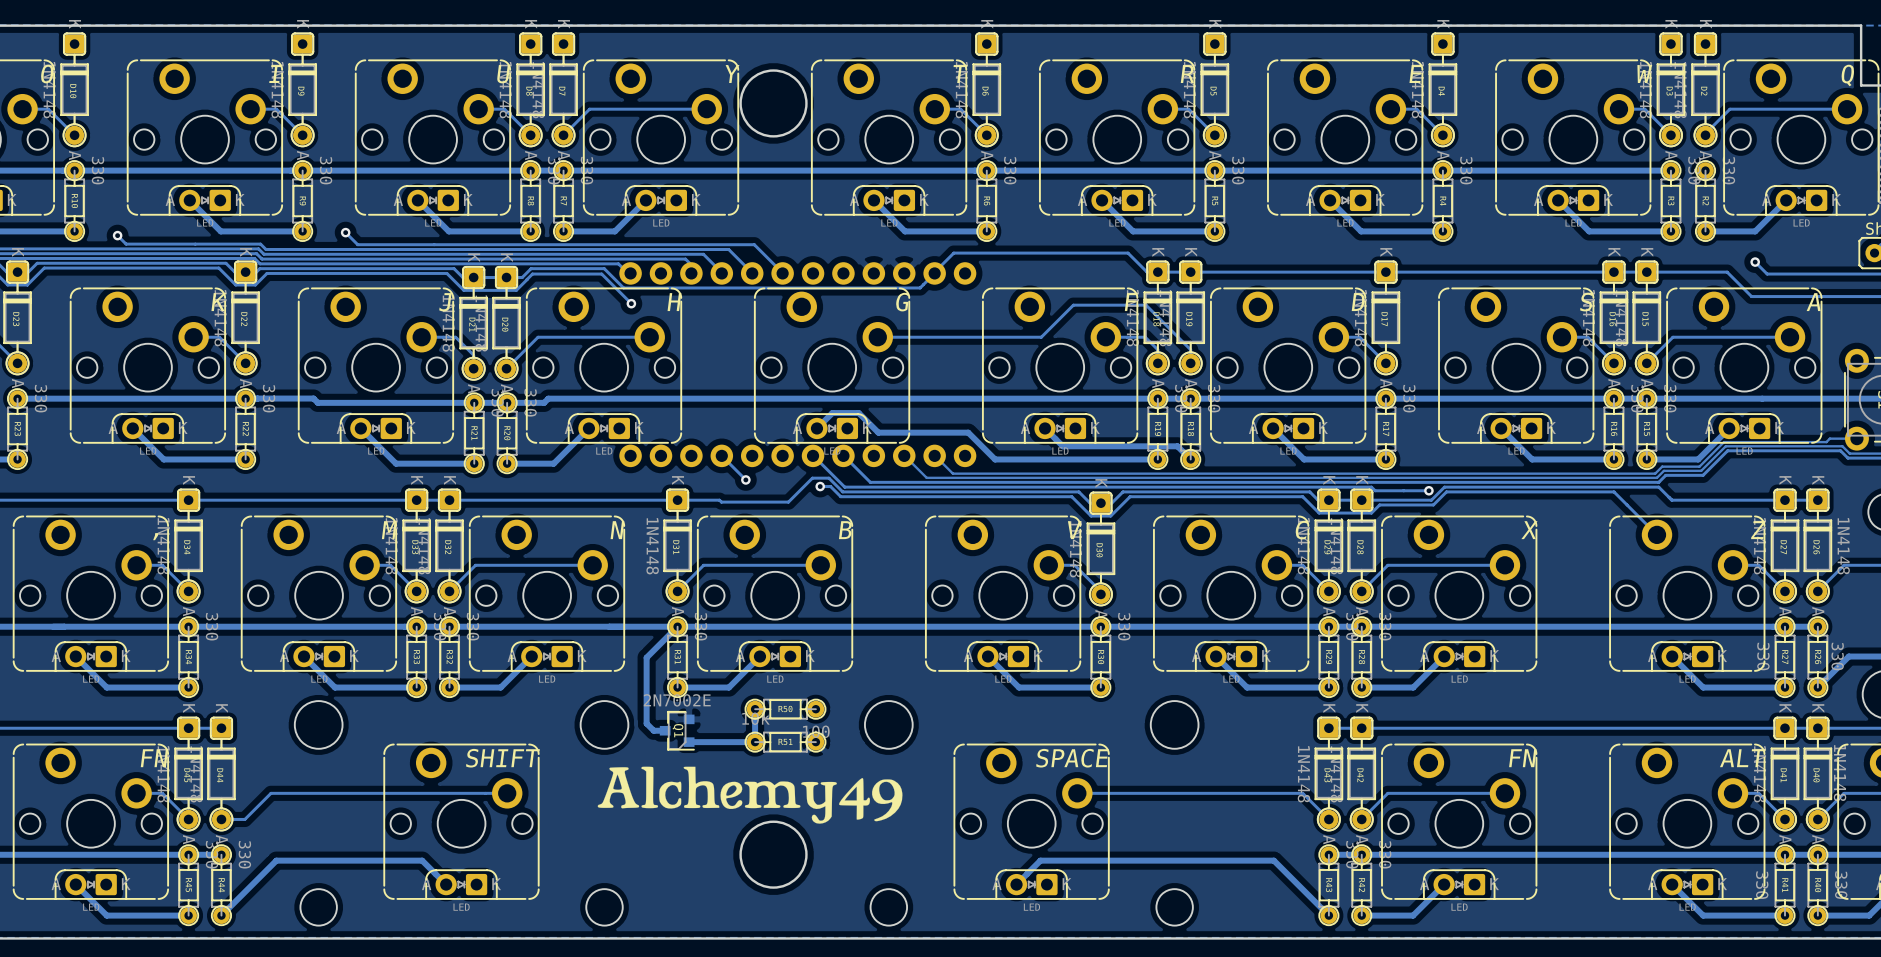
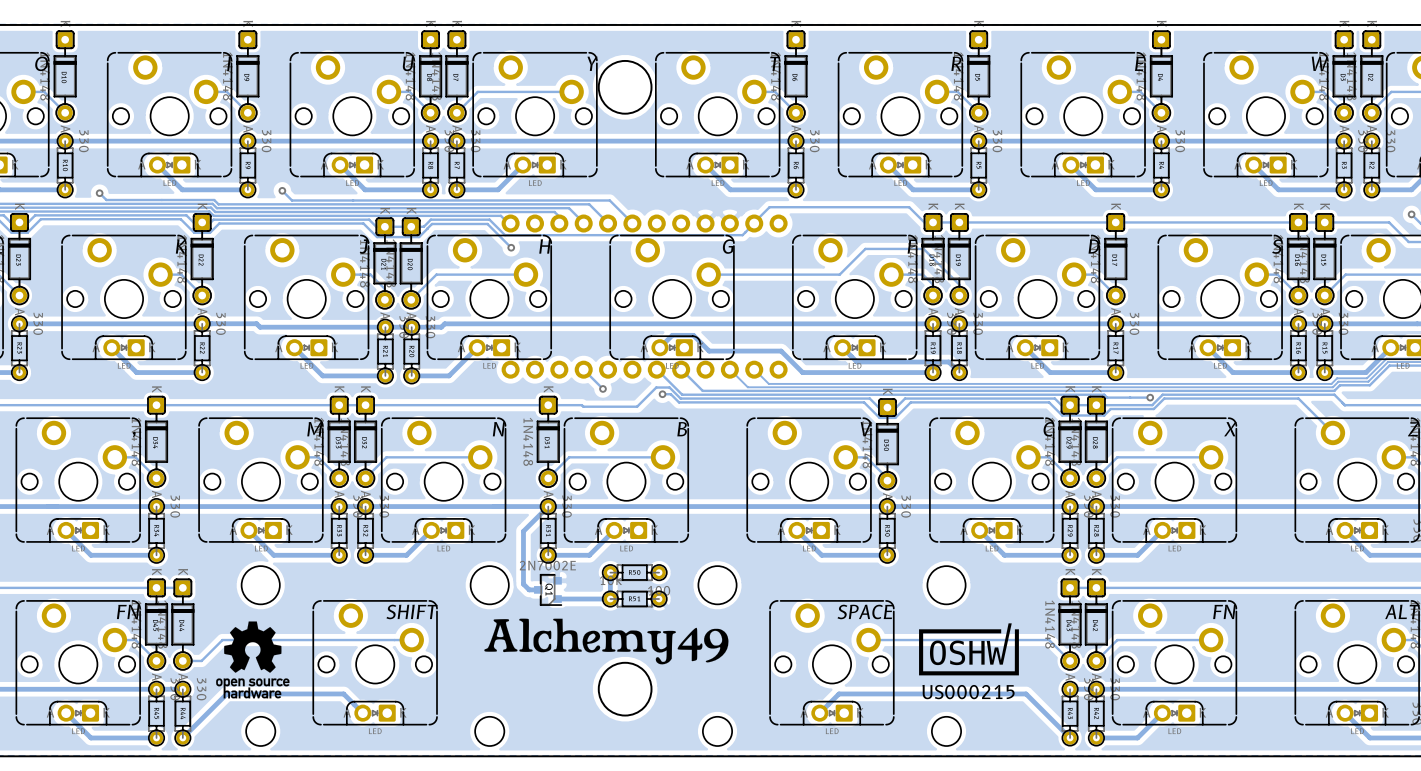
drawing: none -> [216, 621, 290, 699]
drawing: none -> [919, 623, 1019, 676]

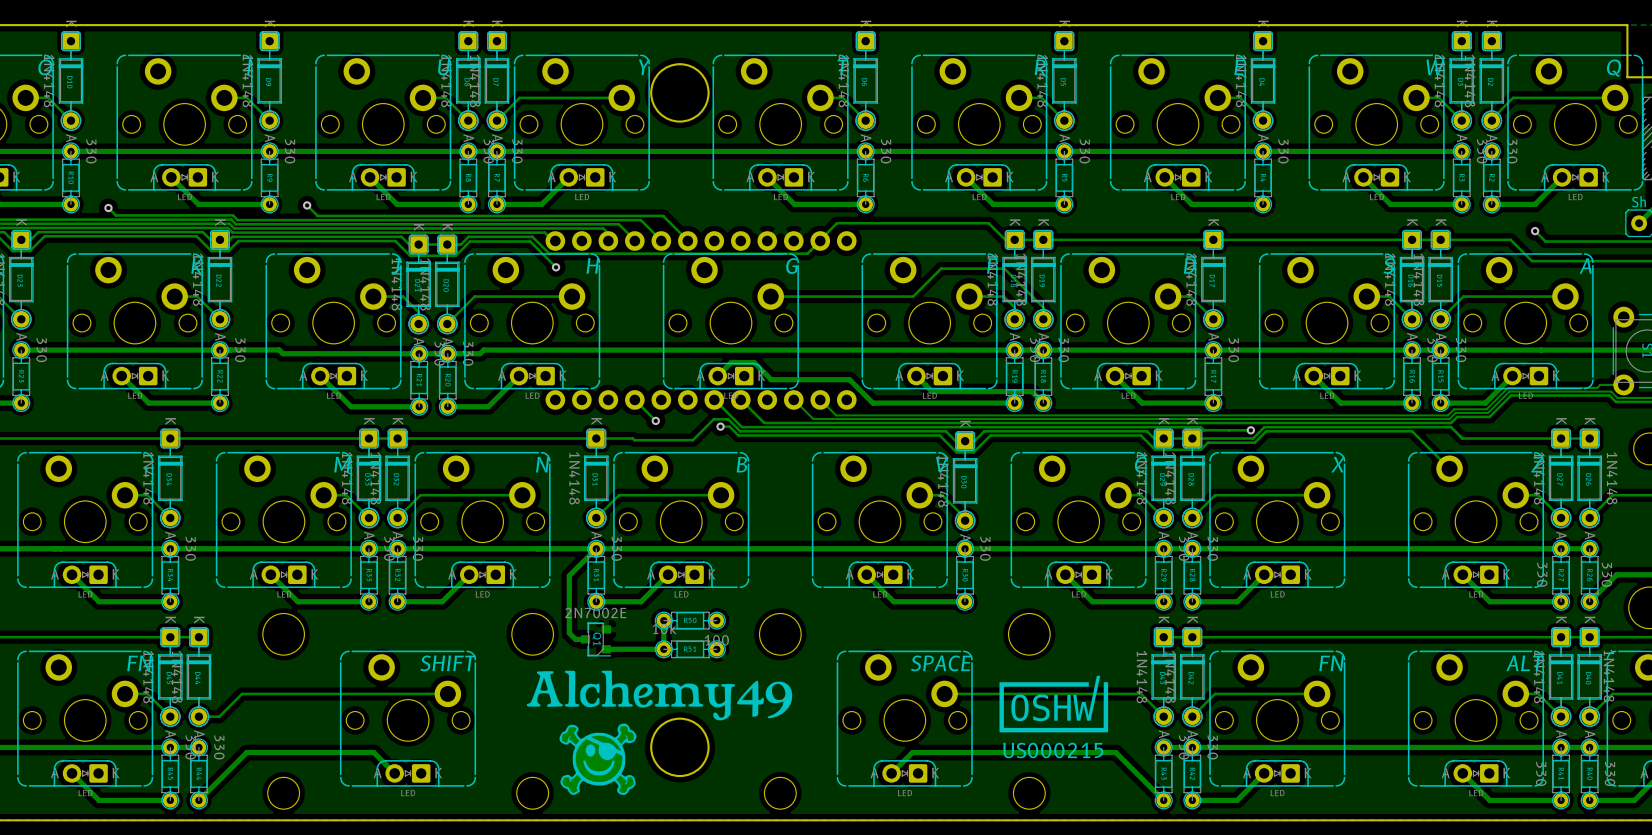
drawing: [216, 621, 290, 699] -> none
part: none -> (597, 759)

